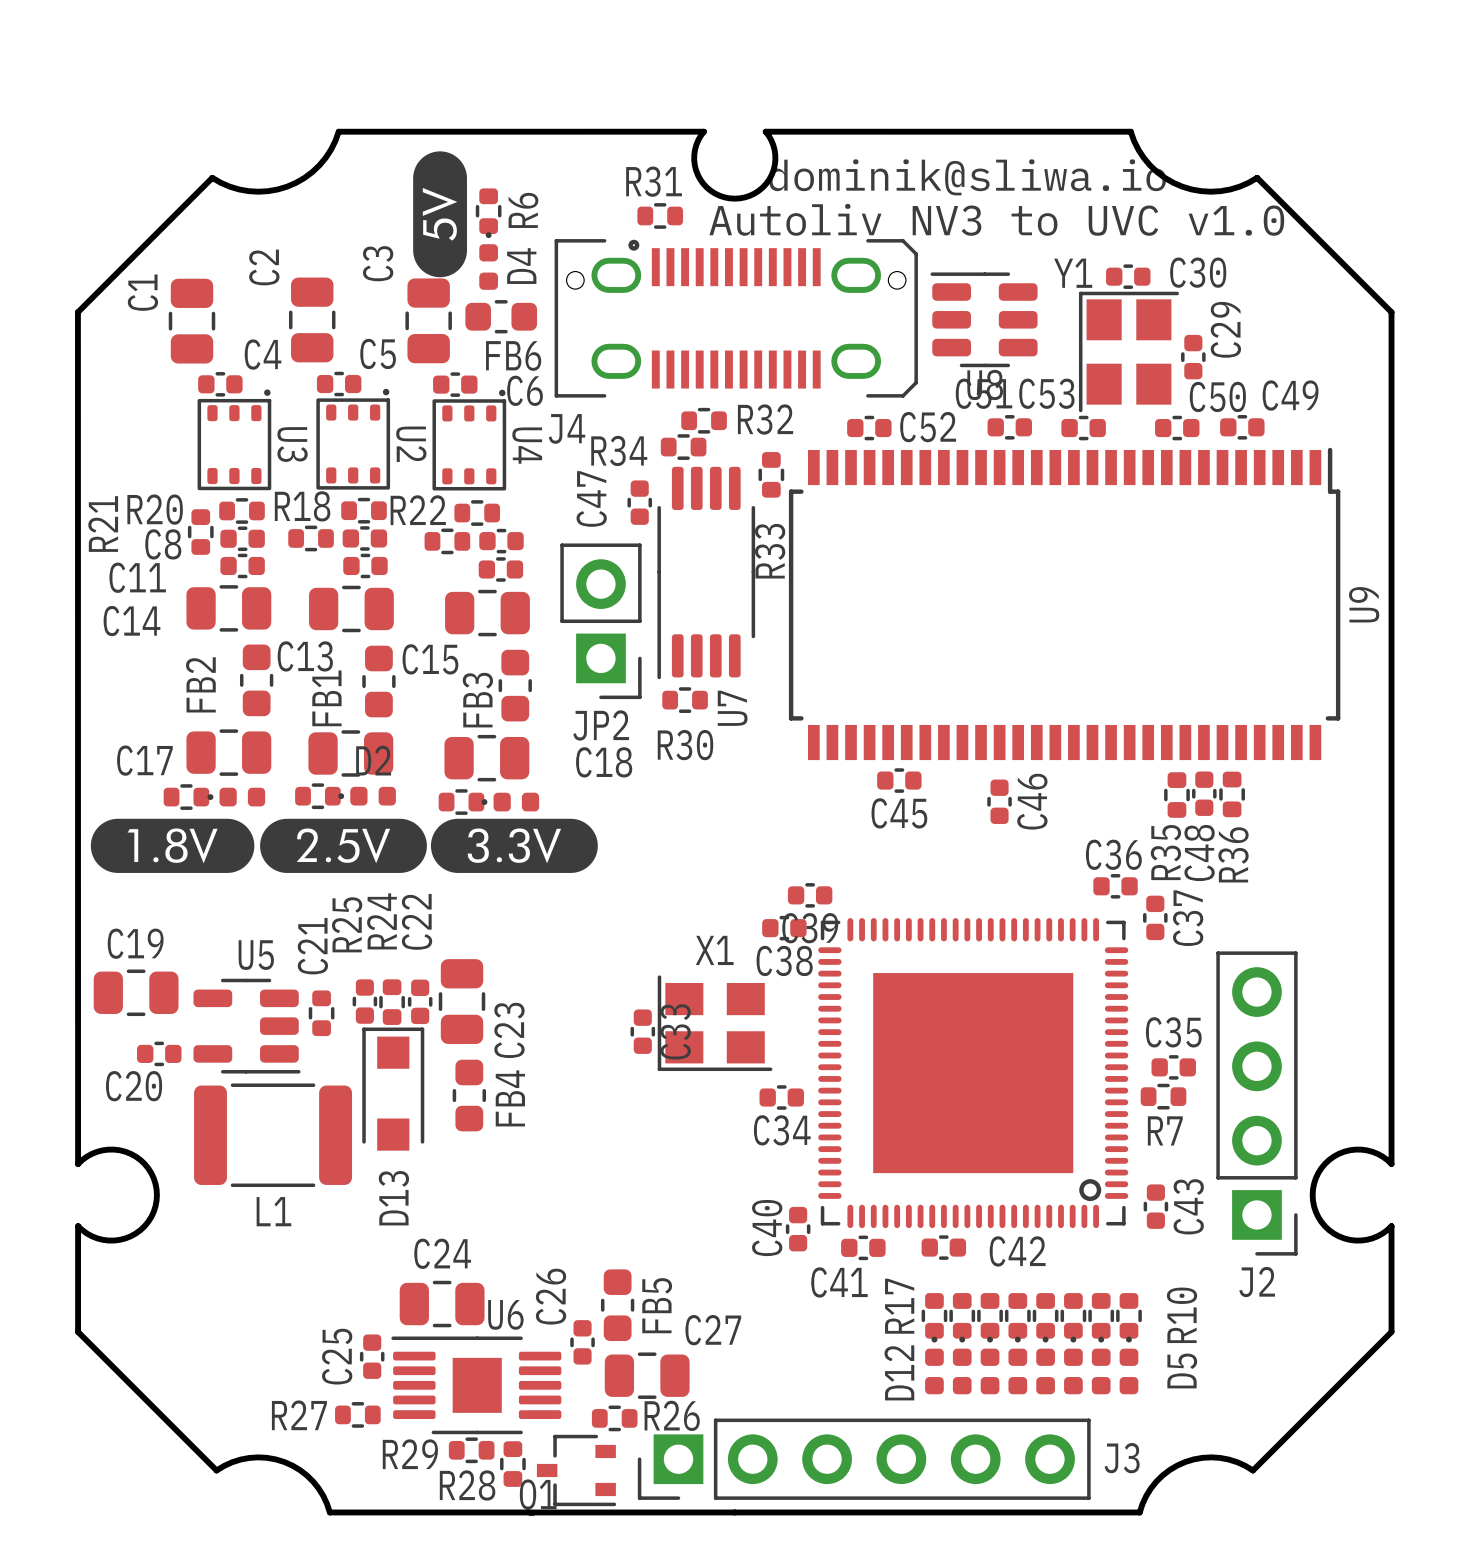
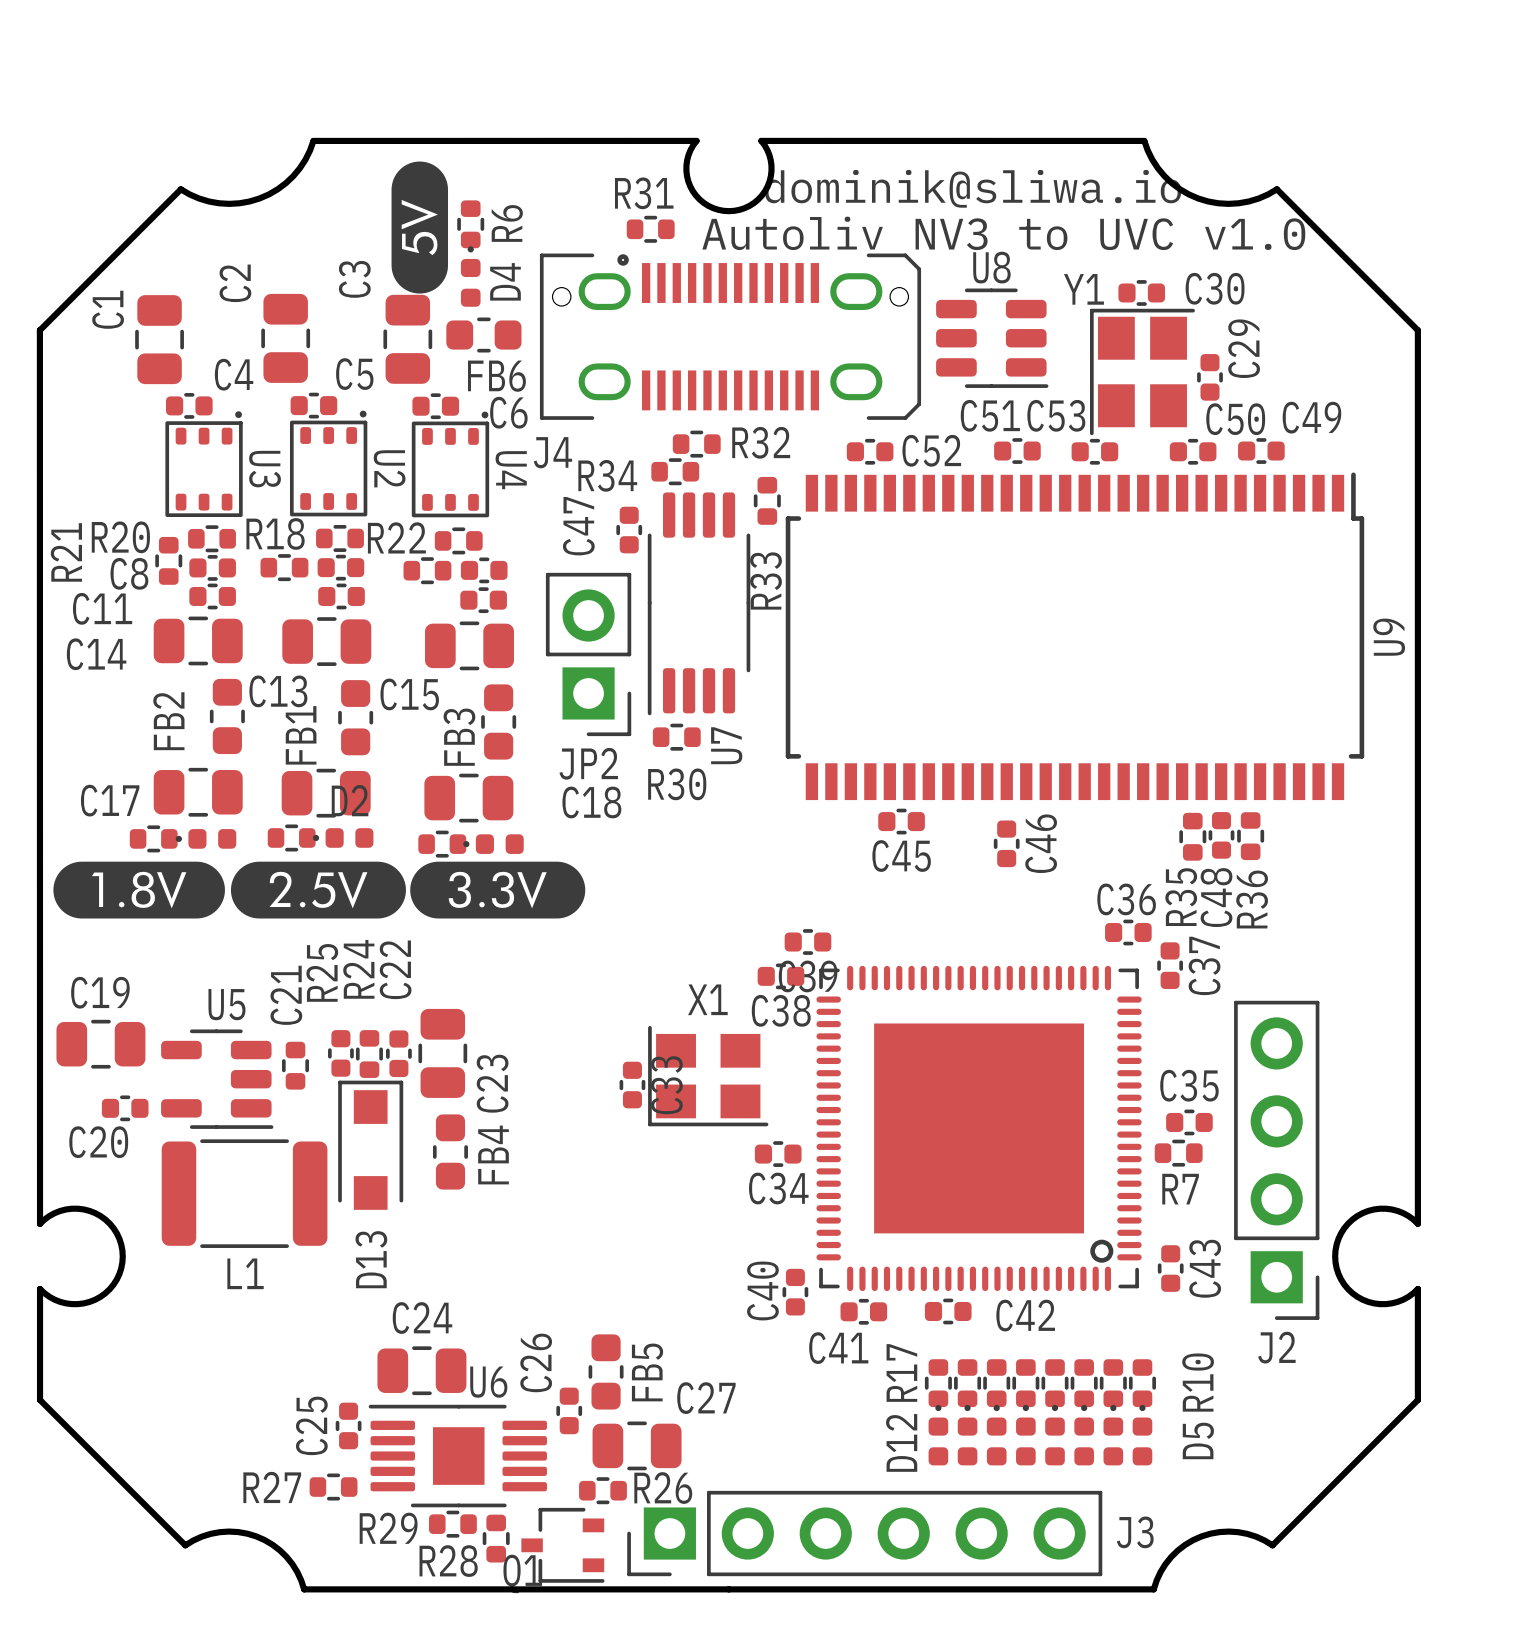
U8 rotation: 0° (984, 319) -> 180° (992, 338)

